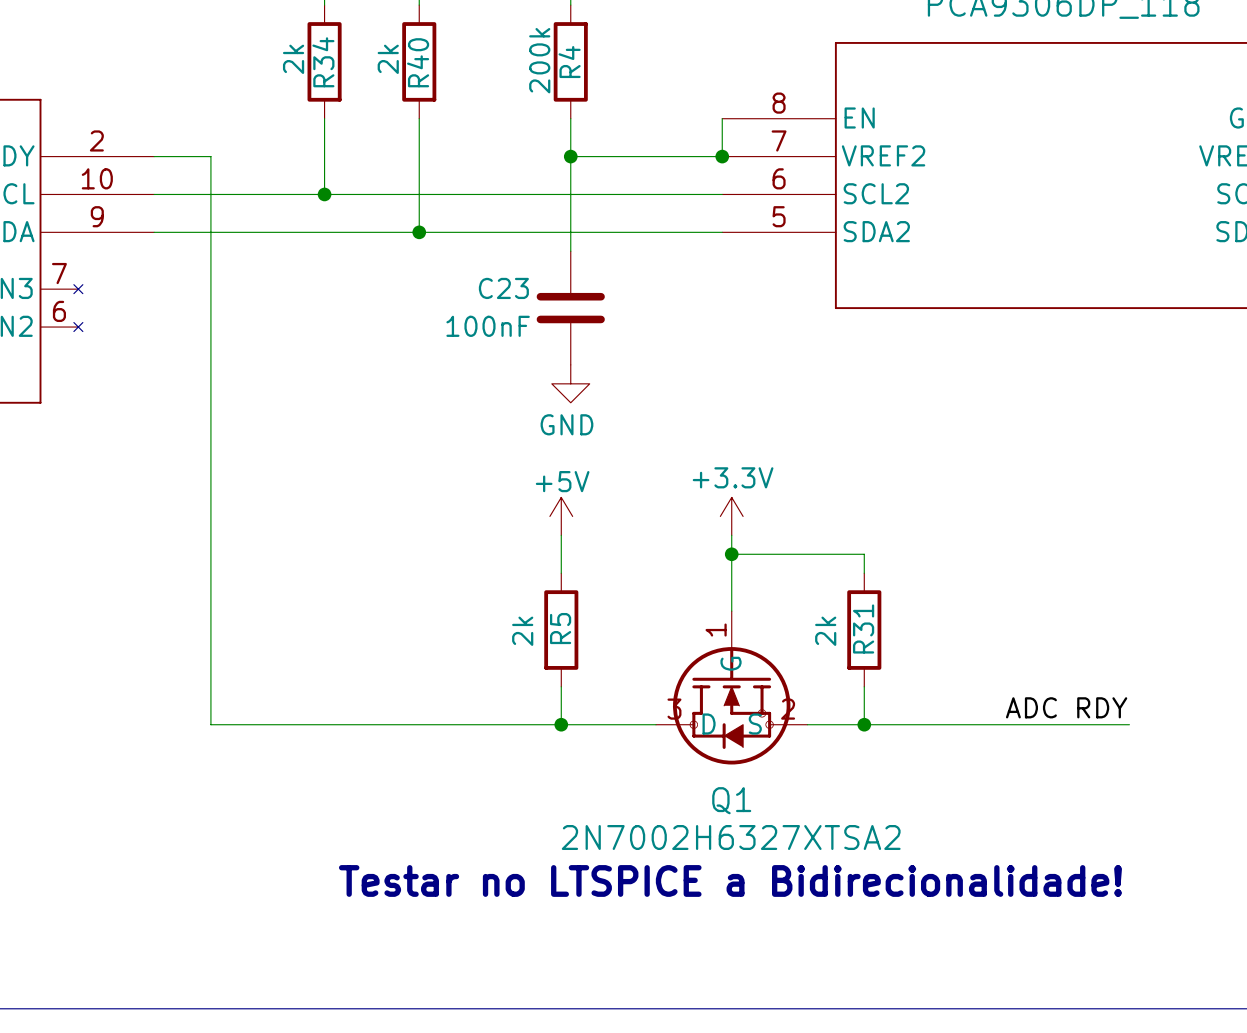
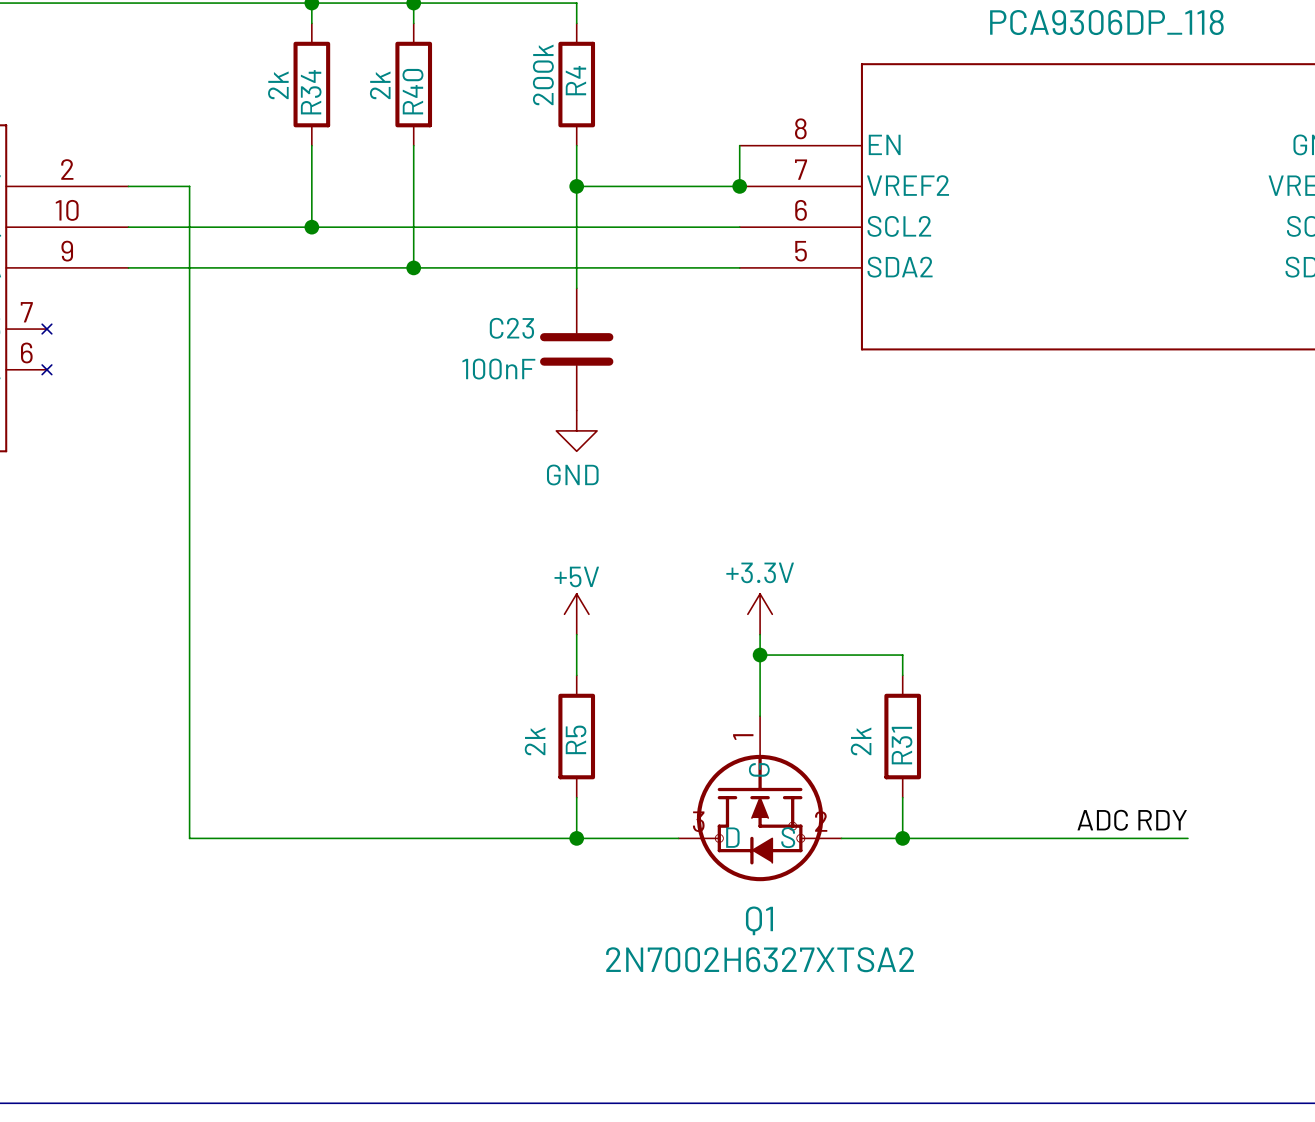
power symbol position: +5V (561, 516) -> +5V (576, 614)
power symbol position: +3.3V (731, 516) -> +3.3V (760, 614)
wire: (561, 535) (561, 573) -> (576, 634) (576, 675)
wire: (731, 535) (731, 611) -> (760, 634) (760, 716)
wire: (731, 554) (864, 554) (864, 573) -> (760, 655) (902, 655) (902, 675)
junction position: (731, 554) -> (760, 655)
R5 position: (561, 630) -> (576, 736)
R31 position: (864, 630) -> (902, 736)
wire: (561, 686) (561, 724) -> (576, 797) (576, 838)
wire: (864, 686) (864, 724) -> (902, 797) (902, 838)
Q1 position: (731, 687) -> (760, 798)
label position: ADC RDY (1066, 707) -> ADC RDY (1132, 820)
wire: (210, 724) (655, 724) -> (189, 797) (189, 838) (678, 838)
junction position: (561, 724) -> (576, 838)
wire: (807, 724) (1129, 724) -> (841, 838) (1187, 838)
junction position: (864, 724) -> (902, 838)
text: Testar no LTSPICE a Bidirecionalidade! (730, 880) -> none

